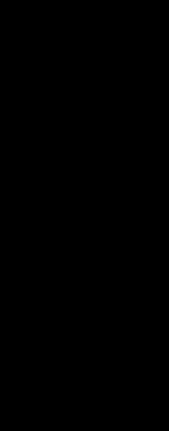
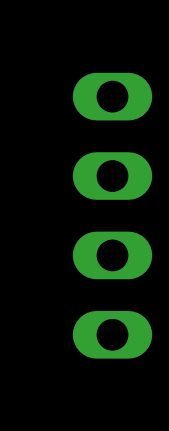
part: none -> (112, 215)

